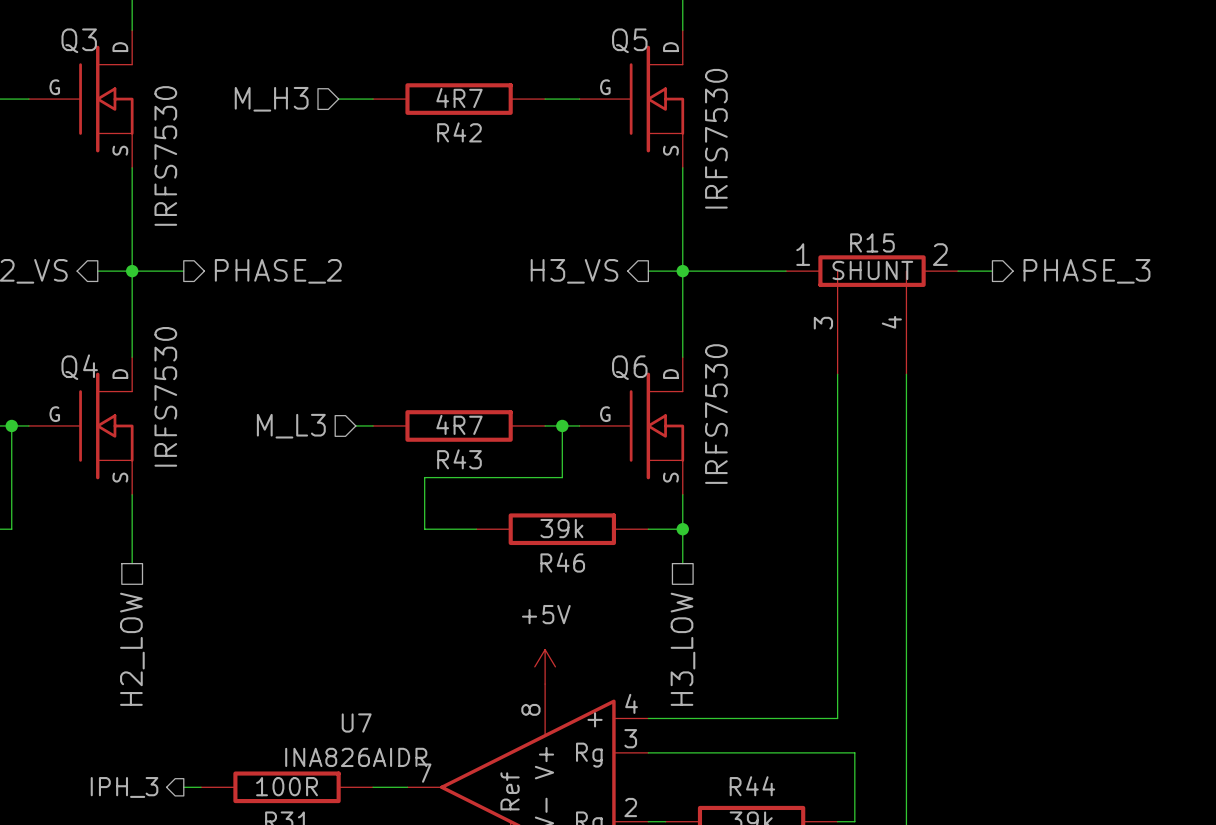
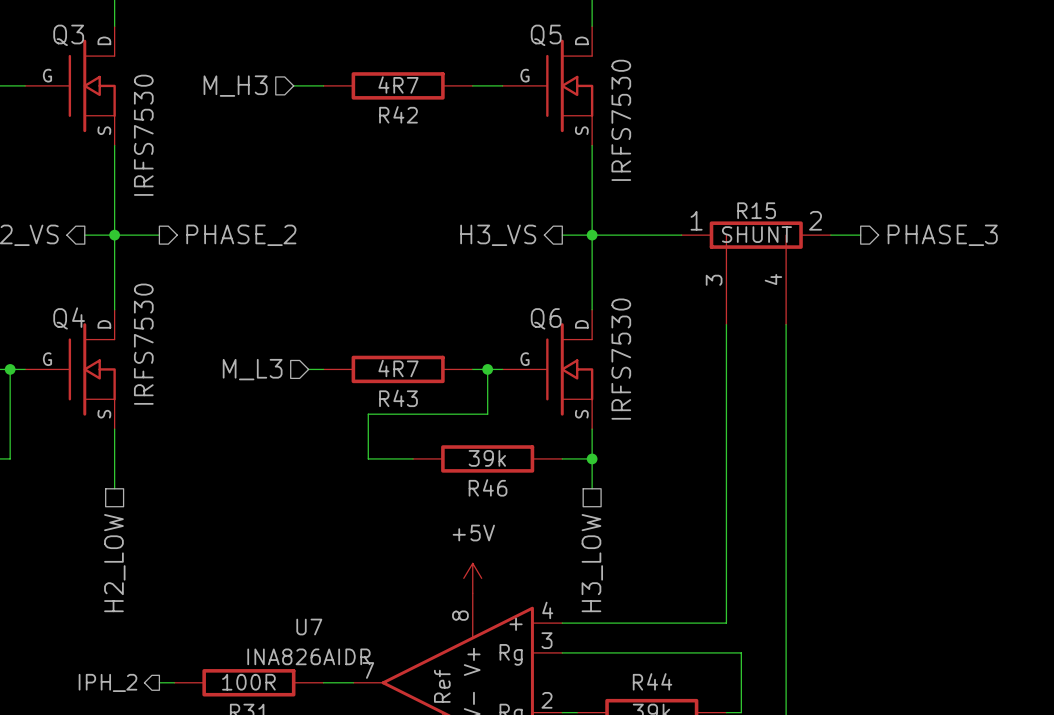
hierarchical label: IPH_3 (124, 787) -> IPH_2 (108, 682)

